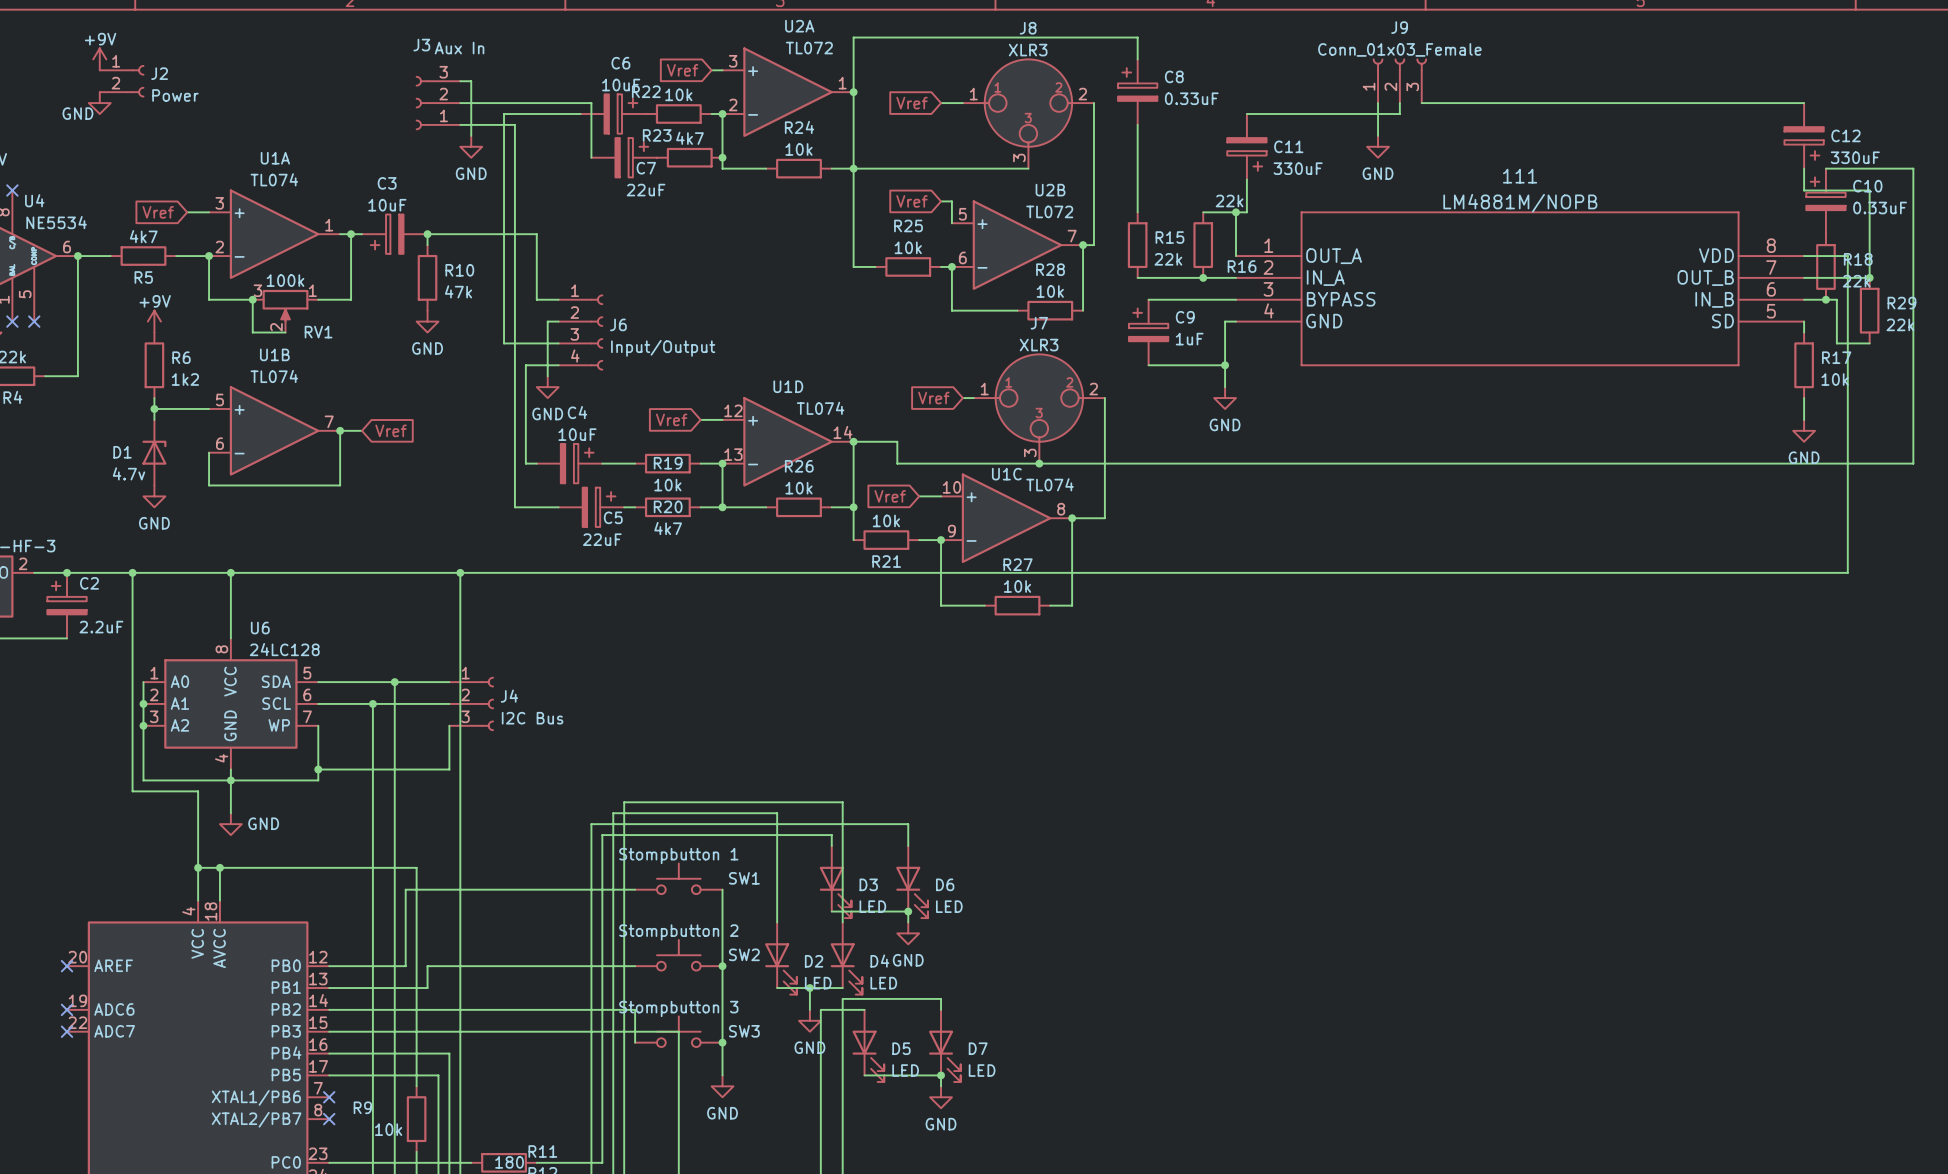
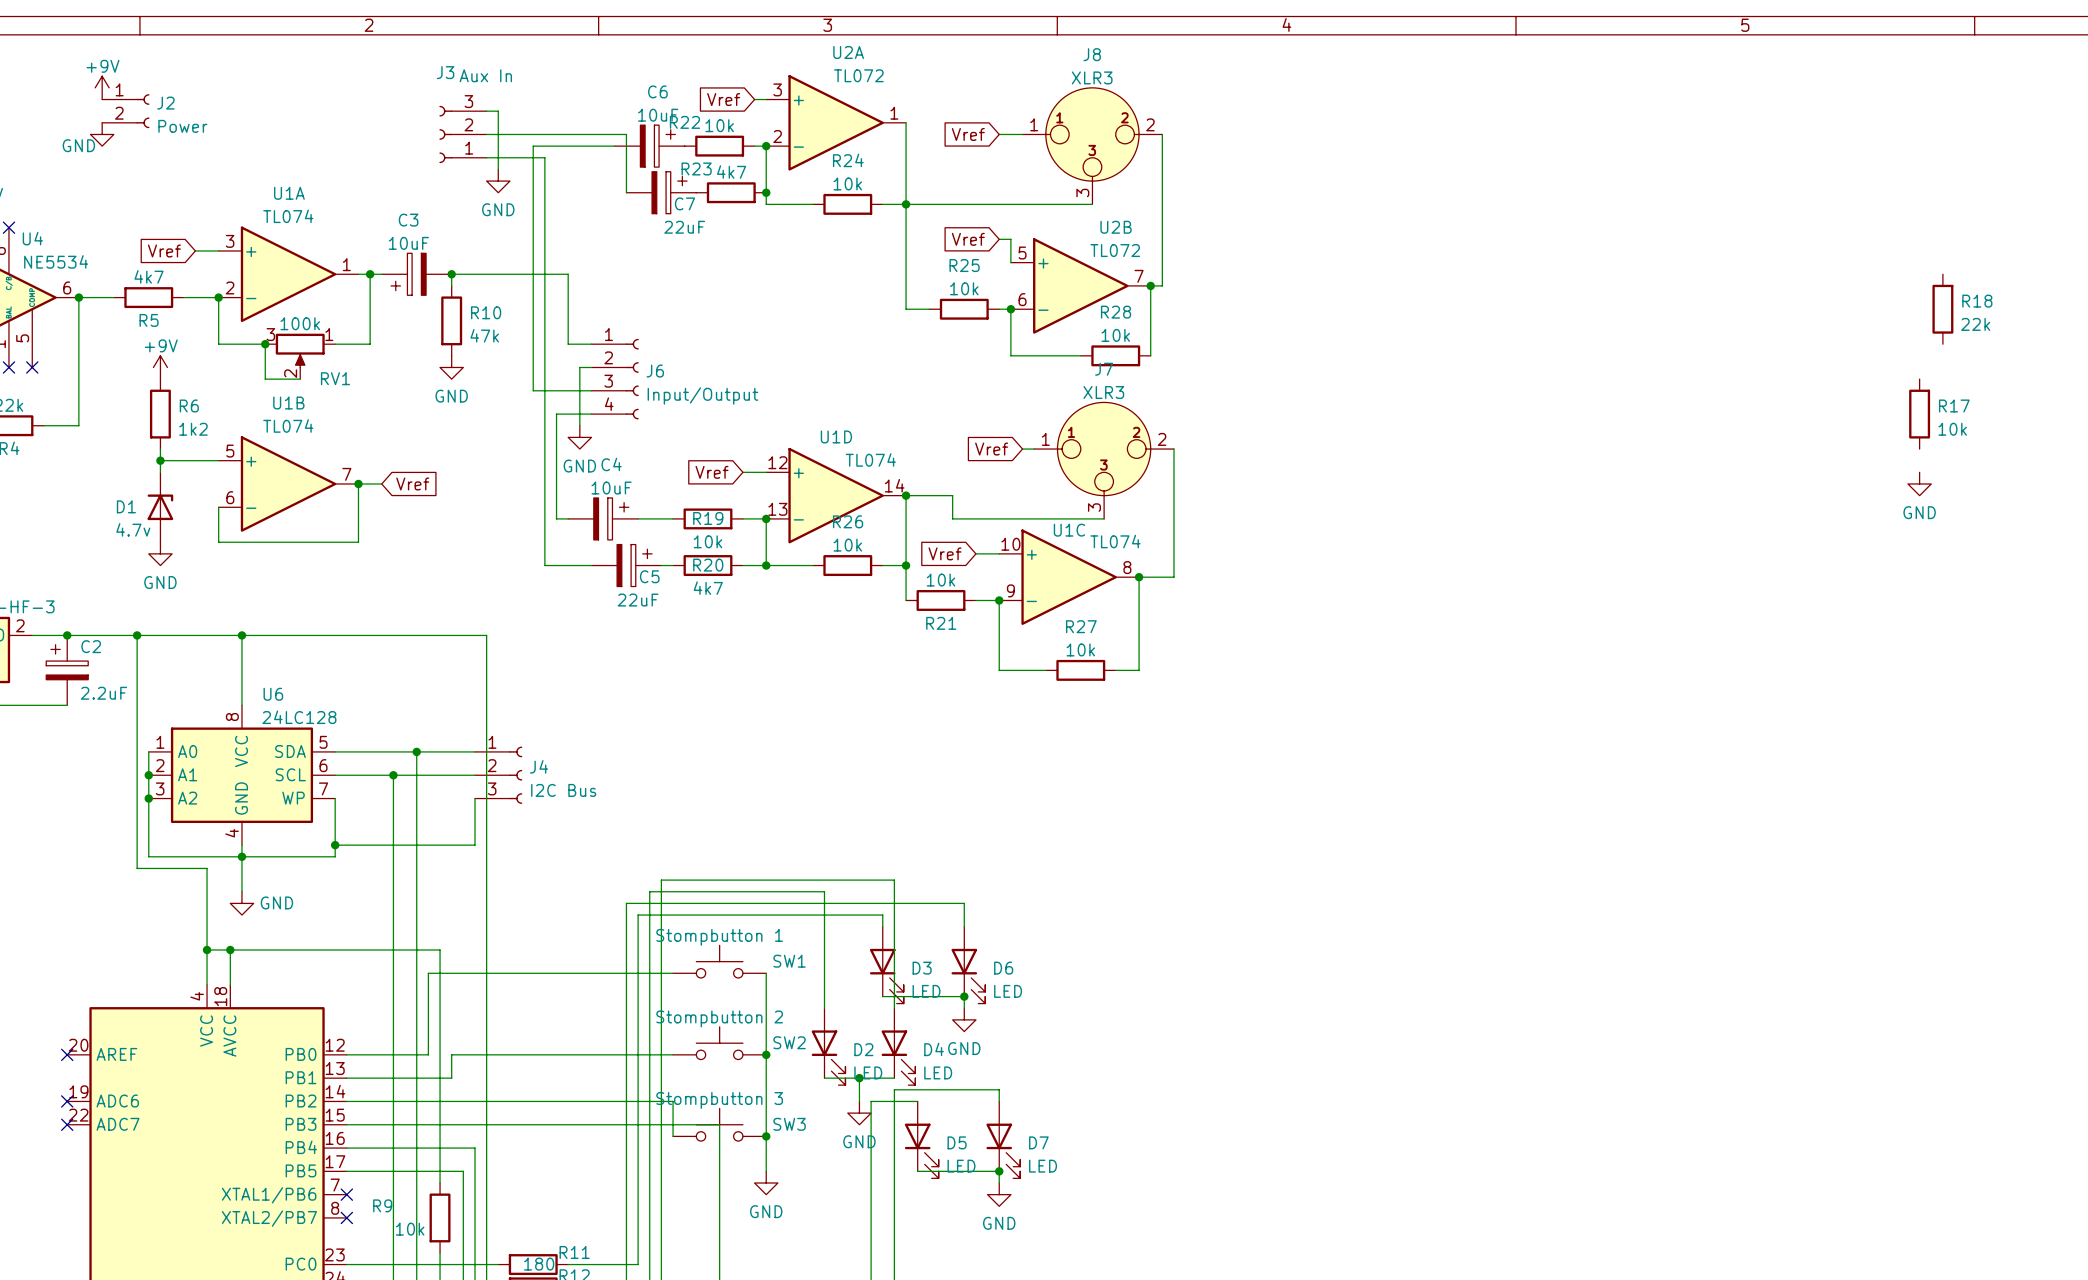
wire: (1137, 59) (1137, 37) (853, 37) (853, 92) -> none
J9: Conn_01x03_Female (1399, 80) -> none
junction: (853, 92) -> none
C8: 0.33uF (1137, 92) -> none
wire: (1378, 103) (1378, 135) -> none
wire: (1399, 103) (1399, 114) (1246, 114) -> none
wire: (1421, 103) (1804, 103) -> none
wire: (1137, 124) (1137, 212) -> none
C12: 330uF (1804, 135) -> none
C11: 330uF (1246, 146) -> none
power symbol: GND (1378, 146) -> none
wire: (1804, 168) (1804, 190) (1869, 190) (1869, 277) (1804, 277) -> none
wire: (1825, 168) (1913, 168) (1913, 463) (1039, 463) -> none
wire: (1246, 179) (1246, 212) (1203, 212) -> none
C10: 0.33uF (1825, 201) -> none
wire: (1236, 212) (1236, 256) -> none
junction: (1236, 212) -> none
R15: 22k (1137, 245) -> none
R16: 22k (1203, 245) -> none
wire: (1804, 256) (1847, 256) (1847, 572) (460, 572) -> none
wire: (1137, 277) (1236, 277) -> none
junction: (1203, 277) -> none
junction: (1869, 277) -> none
111: LM4881M/NOPB (1520, 288) -> none
wire: (1148, 299) (1236, 299) -> none
wire: (1804, 299) (1836, 299) (1836, 343) (1869, 343) -> none
junction: (1825, 299) -> none
R29: 22k (1869, 310) -> none
wire: (1236, 321) (1225, 321) (1225, 387) -> none
wire: (1804, 321) (1804, 332) -> none
C9: 1uF (1148, 332) -> none
wire: (1148, 365) (1225, 365) -> none
junction: (1225, 365) -> none
power symbol: GND (1225, 398) -> none
wire: (1804, 398) (1804, 419) -> none
junction: (1039, 463) -> none
junction: (460, 572) -> none

